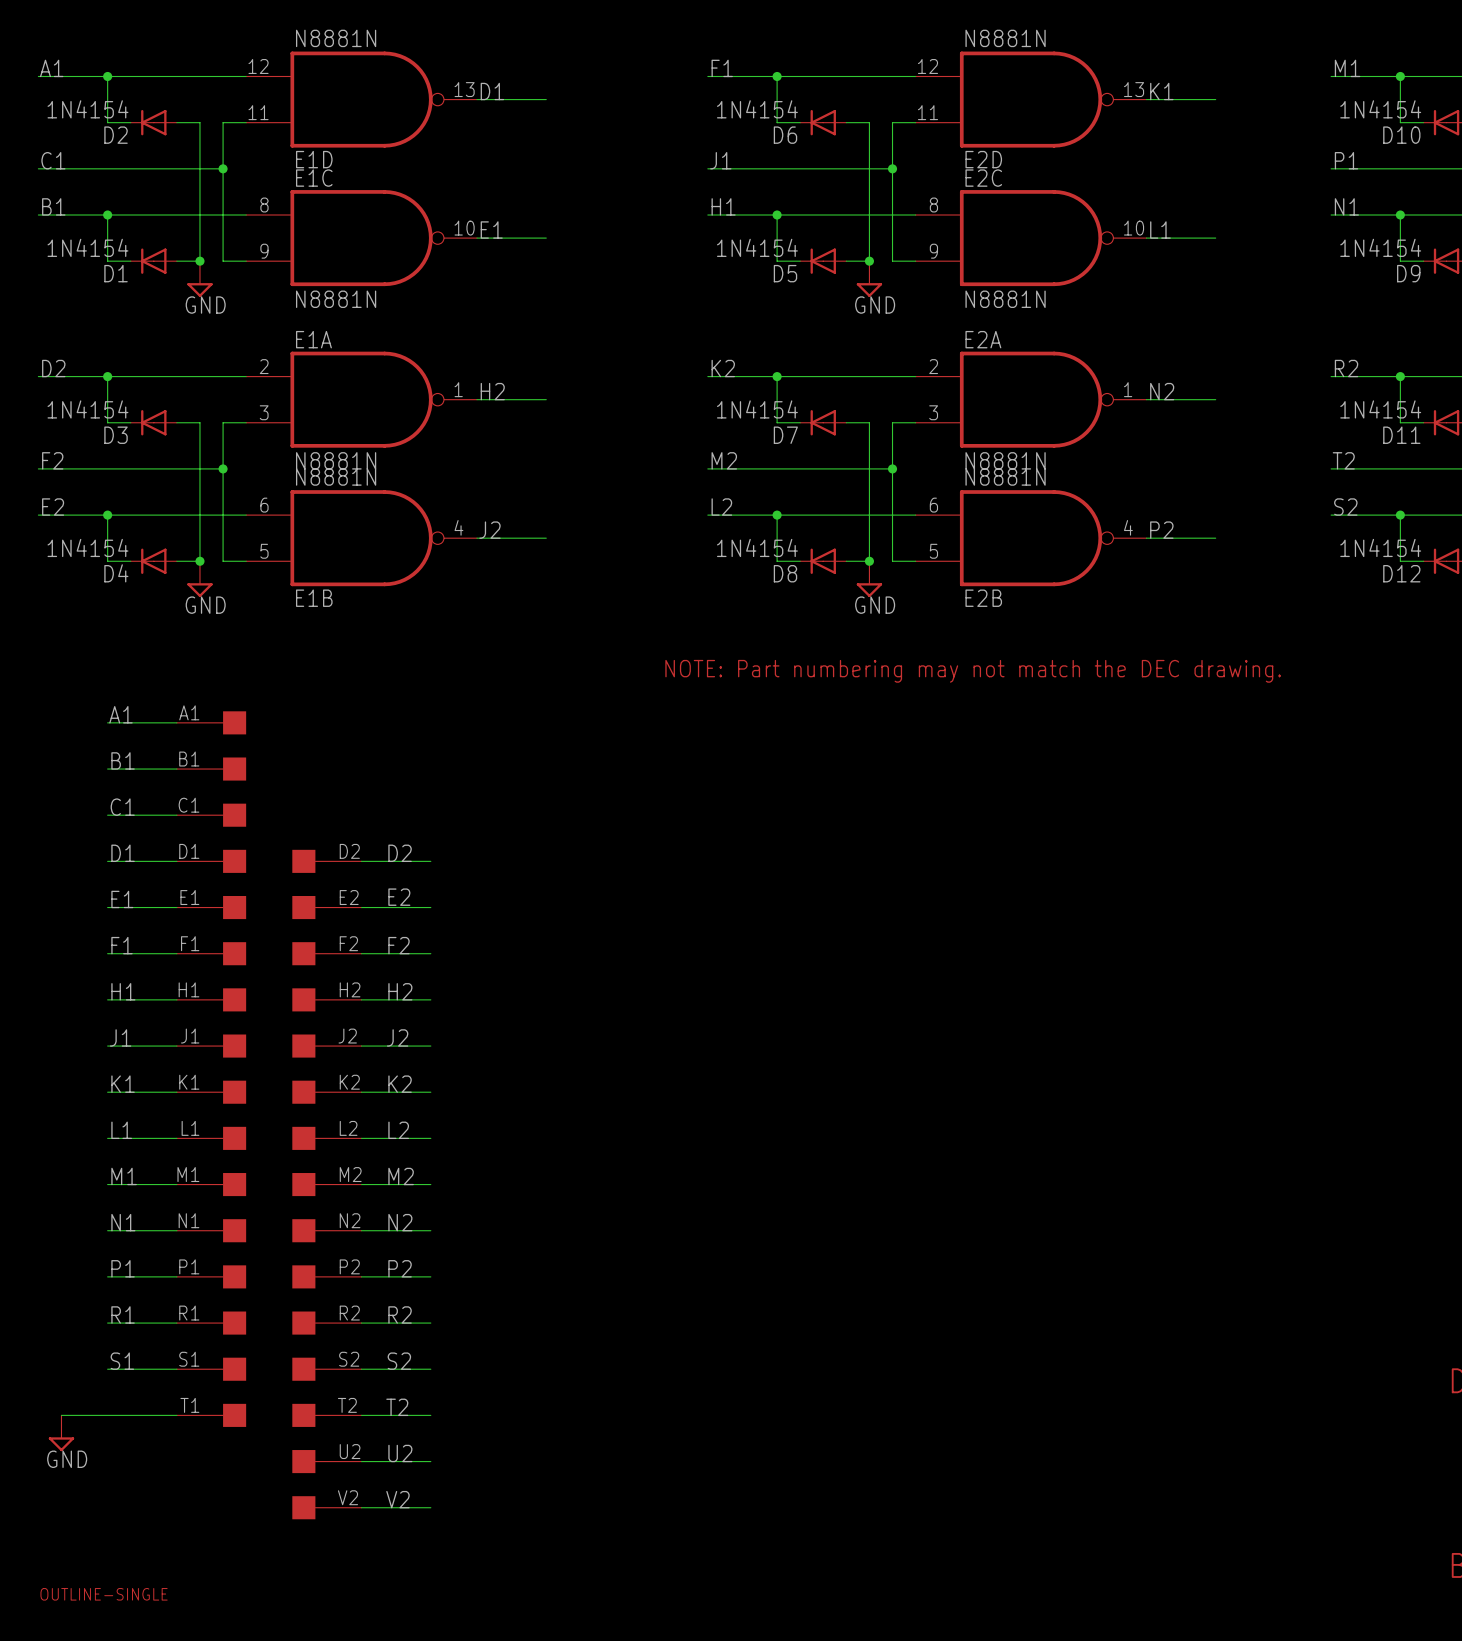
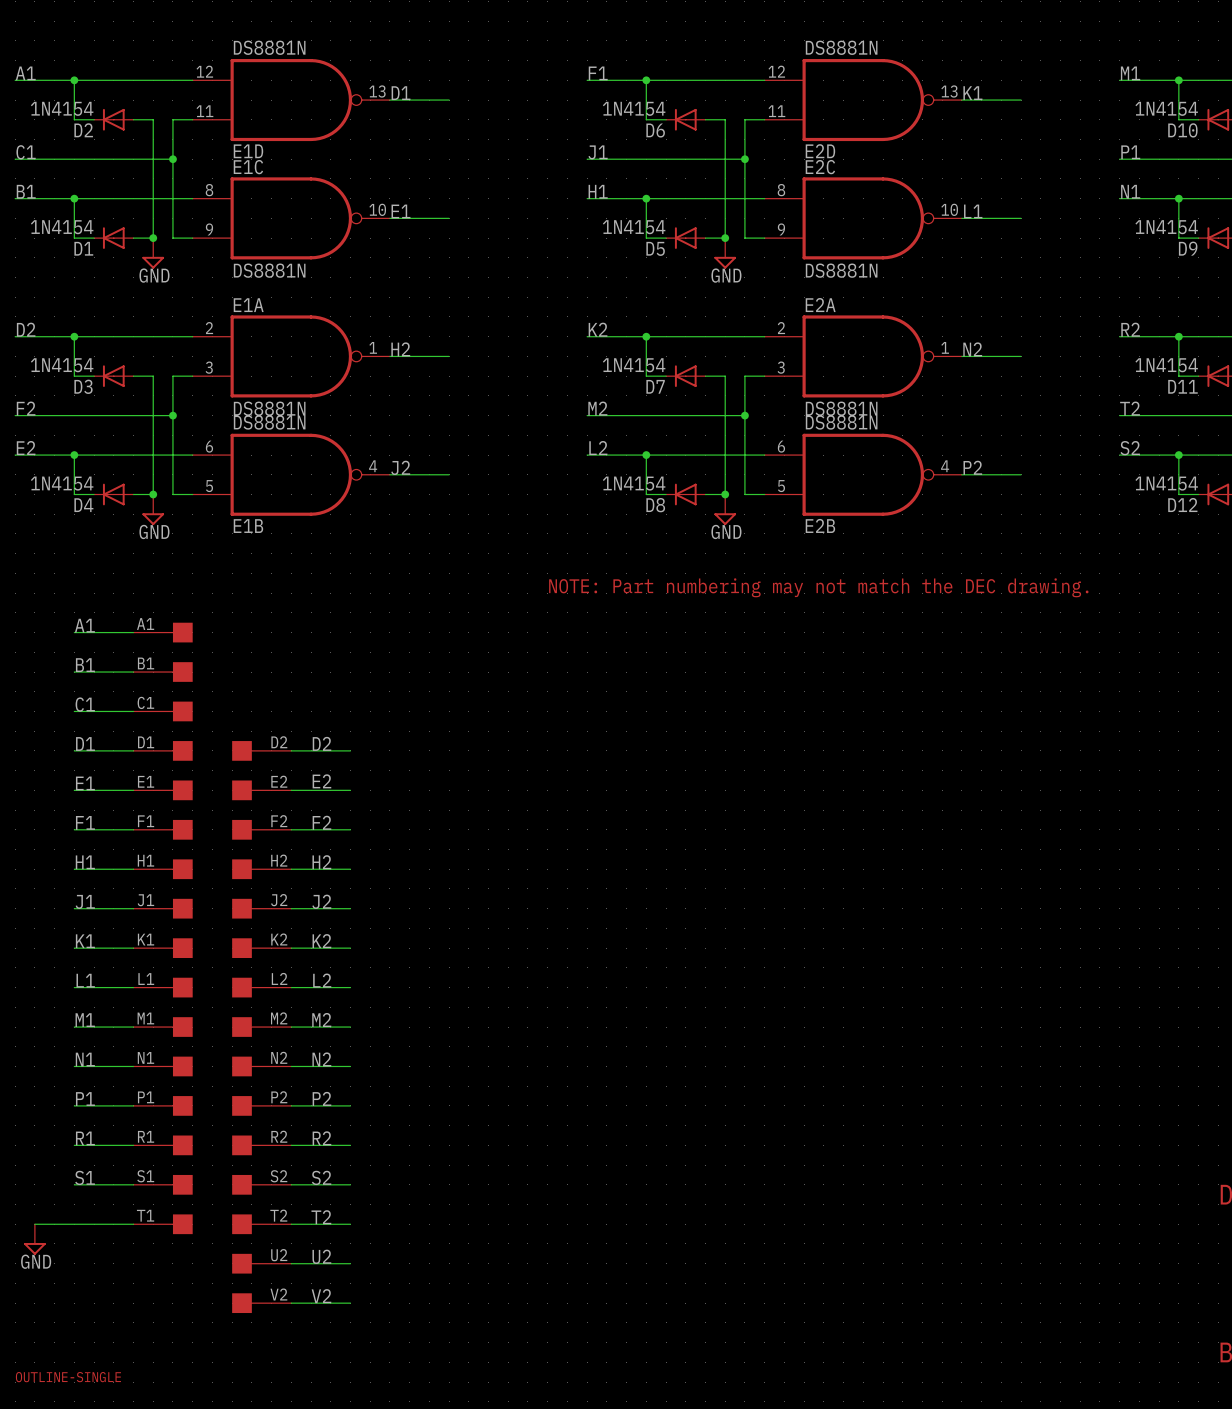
E1D value: N8881N (336, 38) -> DS8881N (269, 47)
E2D value: N8881N (1005, 38) -> DS8881N (841, 47)
E1C value: N8881N (336, 299) -> DS8881N (269, 270)
E2C value: N8881N (1005, 299) -> DS8881N (841, 270)
E1A value: N8881N (336, 460) -> DS8881N (269, 408)
E2A value: N8881N (1005, 460) -> DS8881N (841, 408)
E1B value: N8881N (336, 477) -> DS8881N (269, 422)
E2B value: N8881N (1005, 477) -> DS8881N (841, 422)

